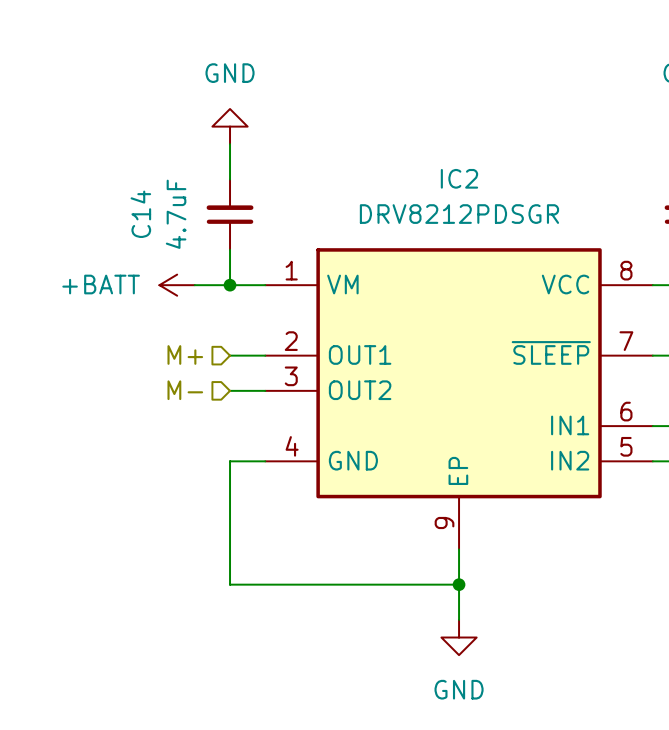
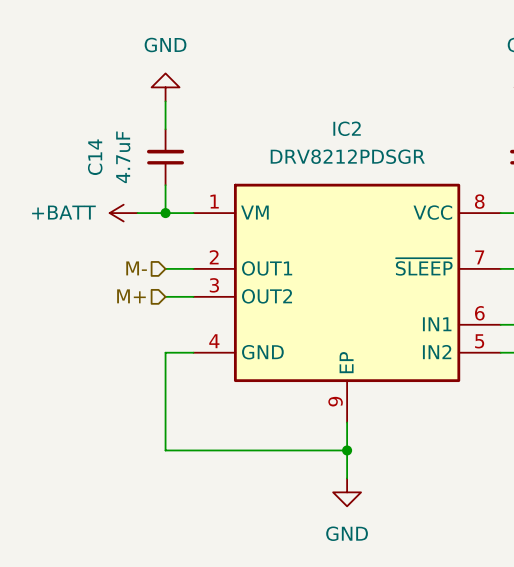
hierarchical label: M+ (185, 354) -> M- (136, 268)
hierarchical label: M- (185, 390) -> M+ (131, 296)

